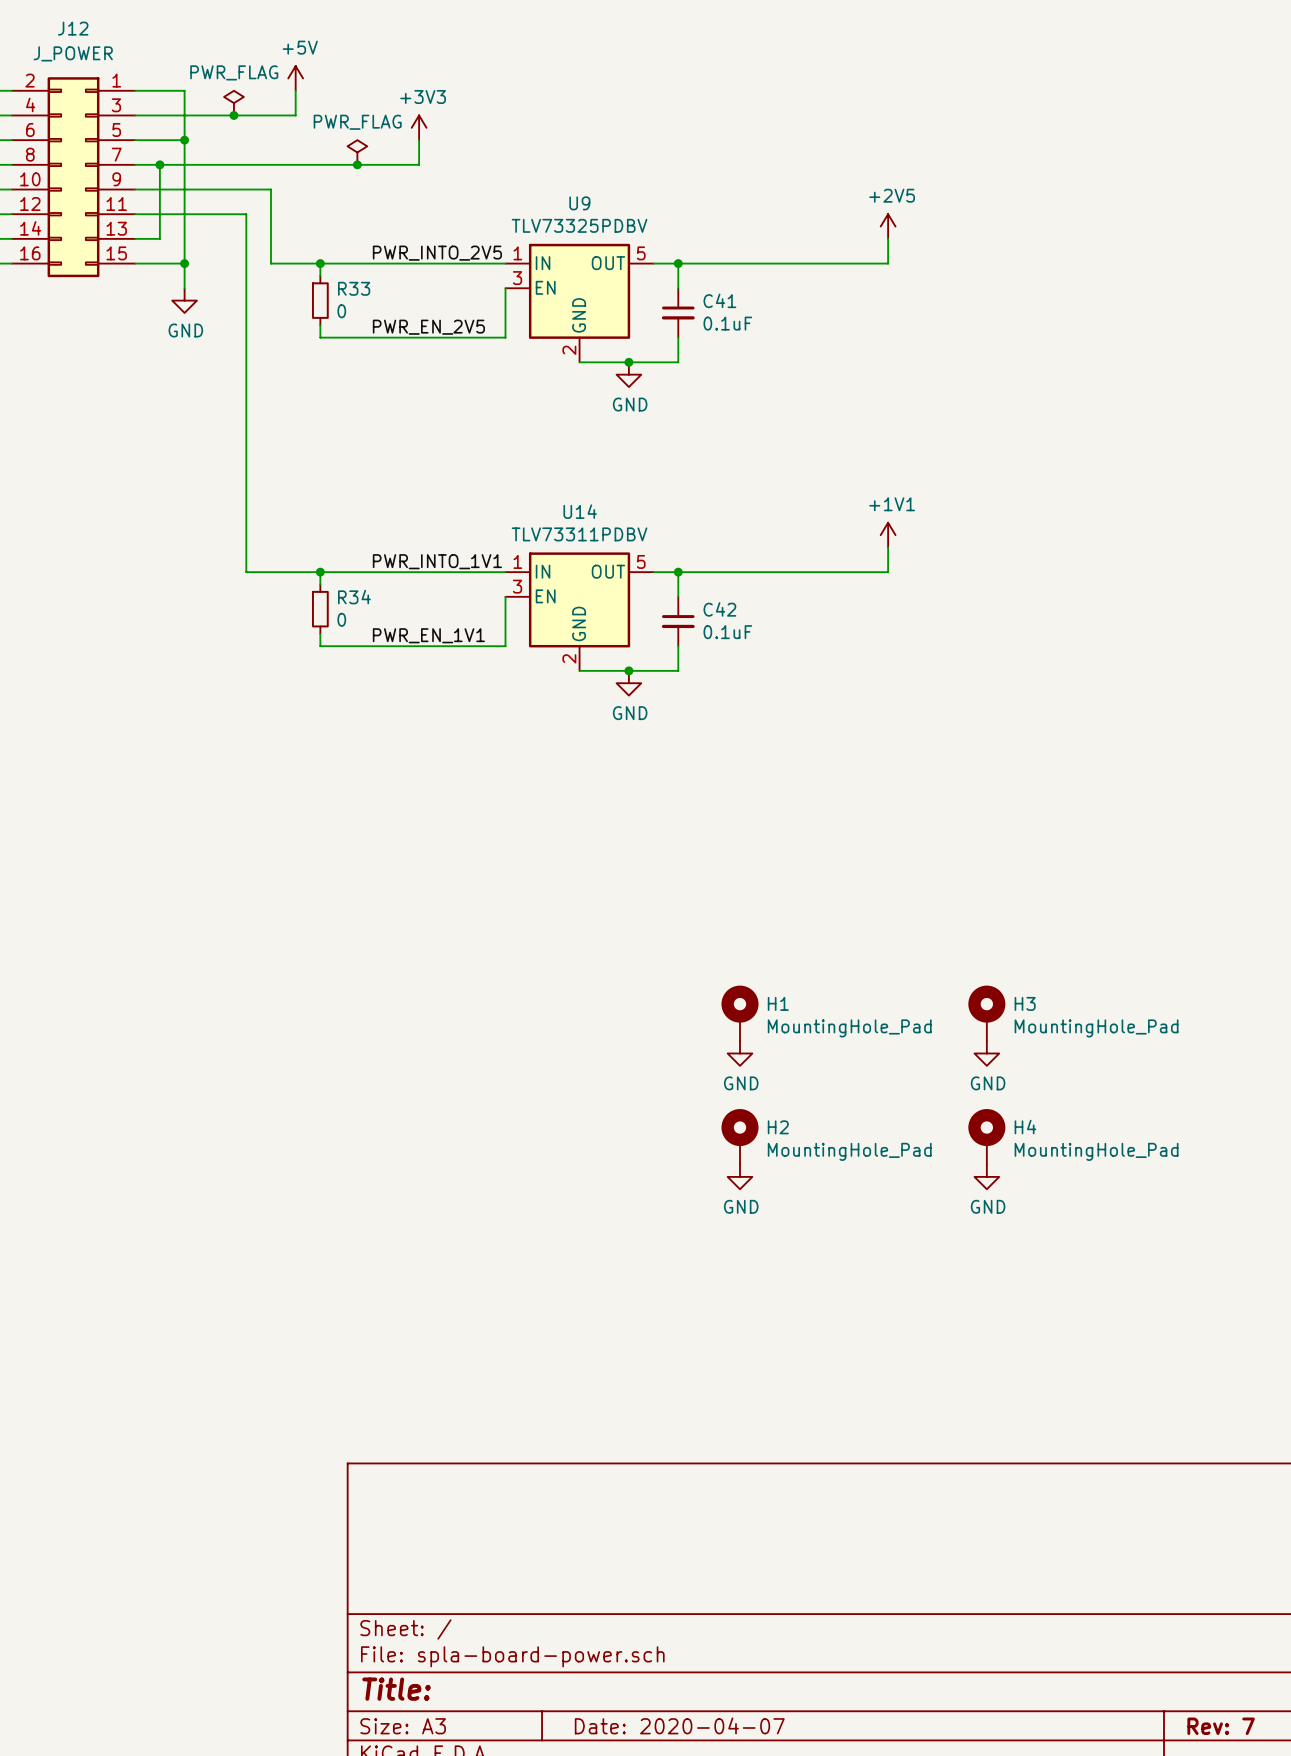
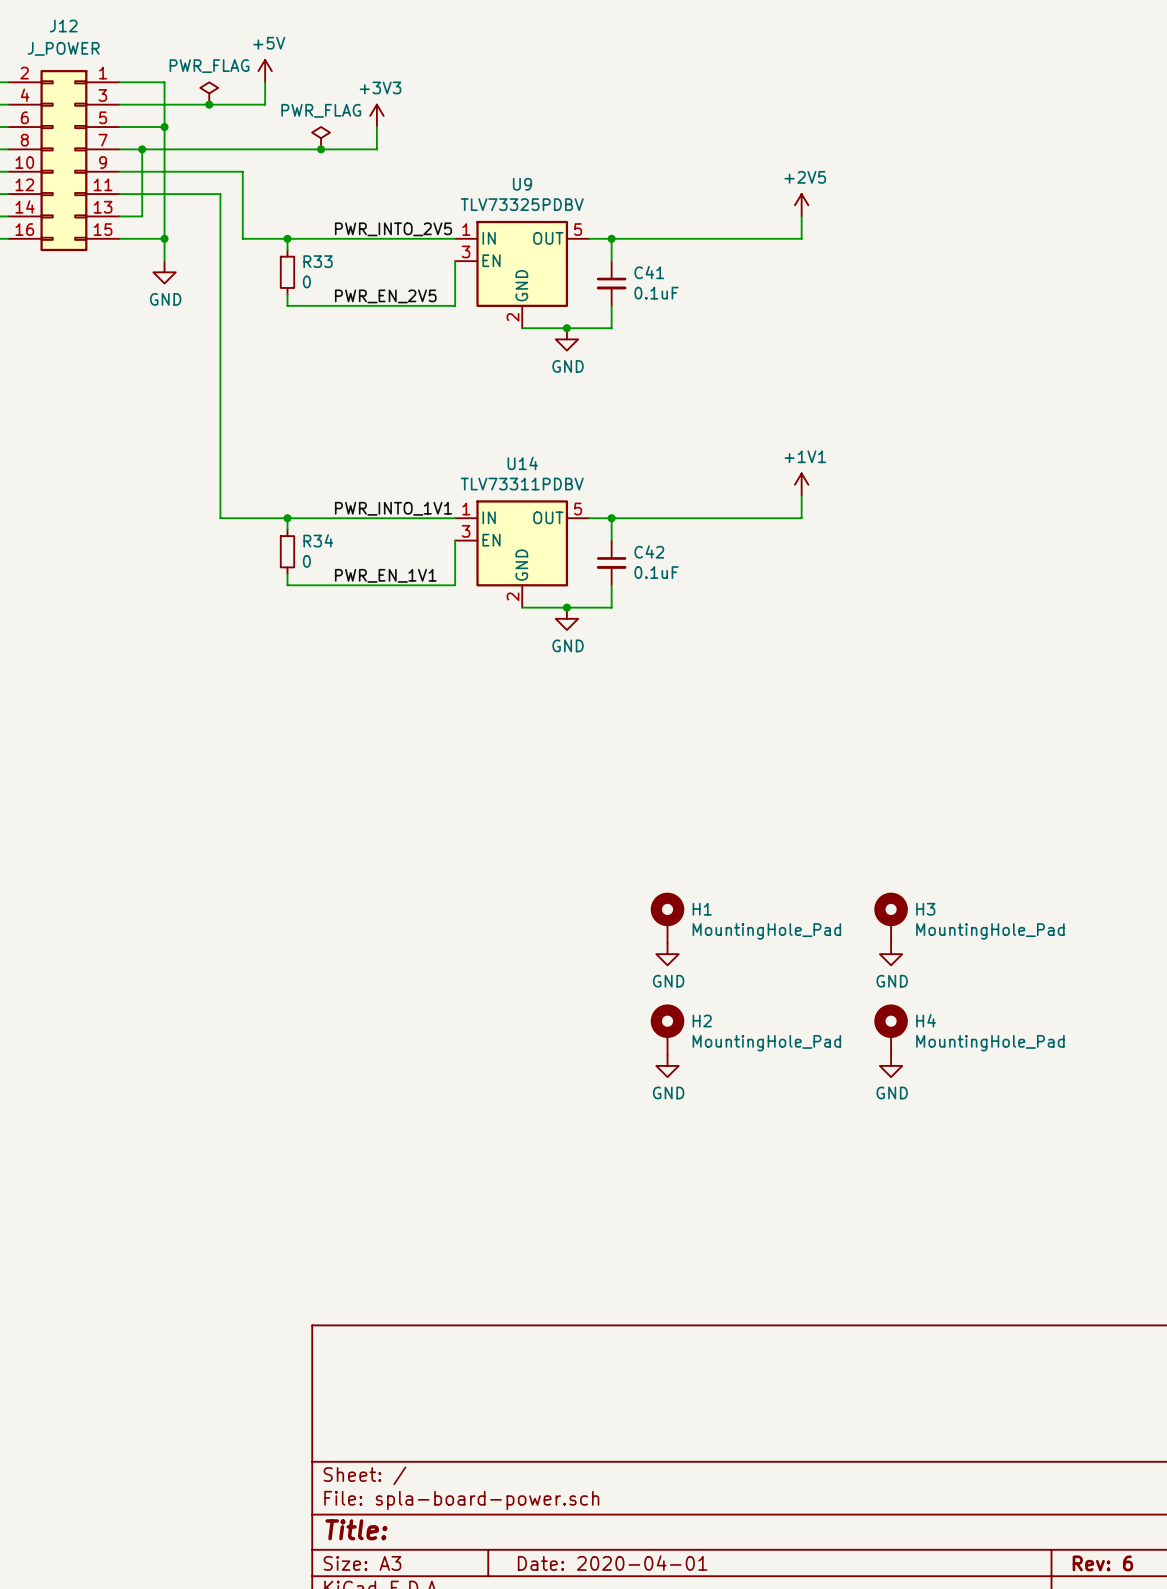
title block: Date: 2020-04-07 (679, 1725) -> Date: 2020-04-01 (612, 1563)
title block: Rev: 7 (1221, 1726) -> Rev: 6 (1102, 1563)

